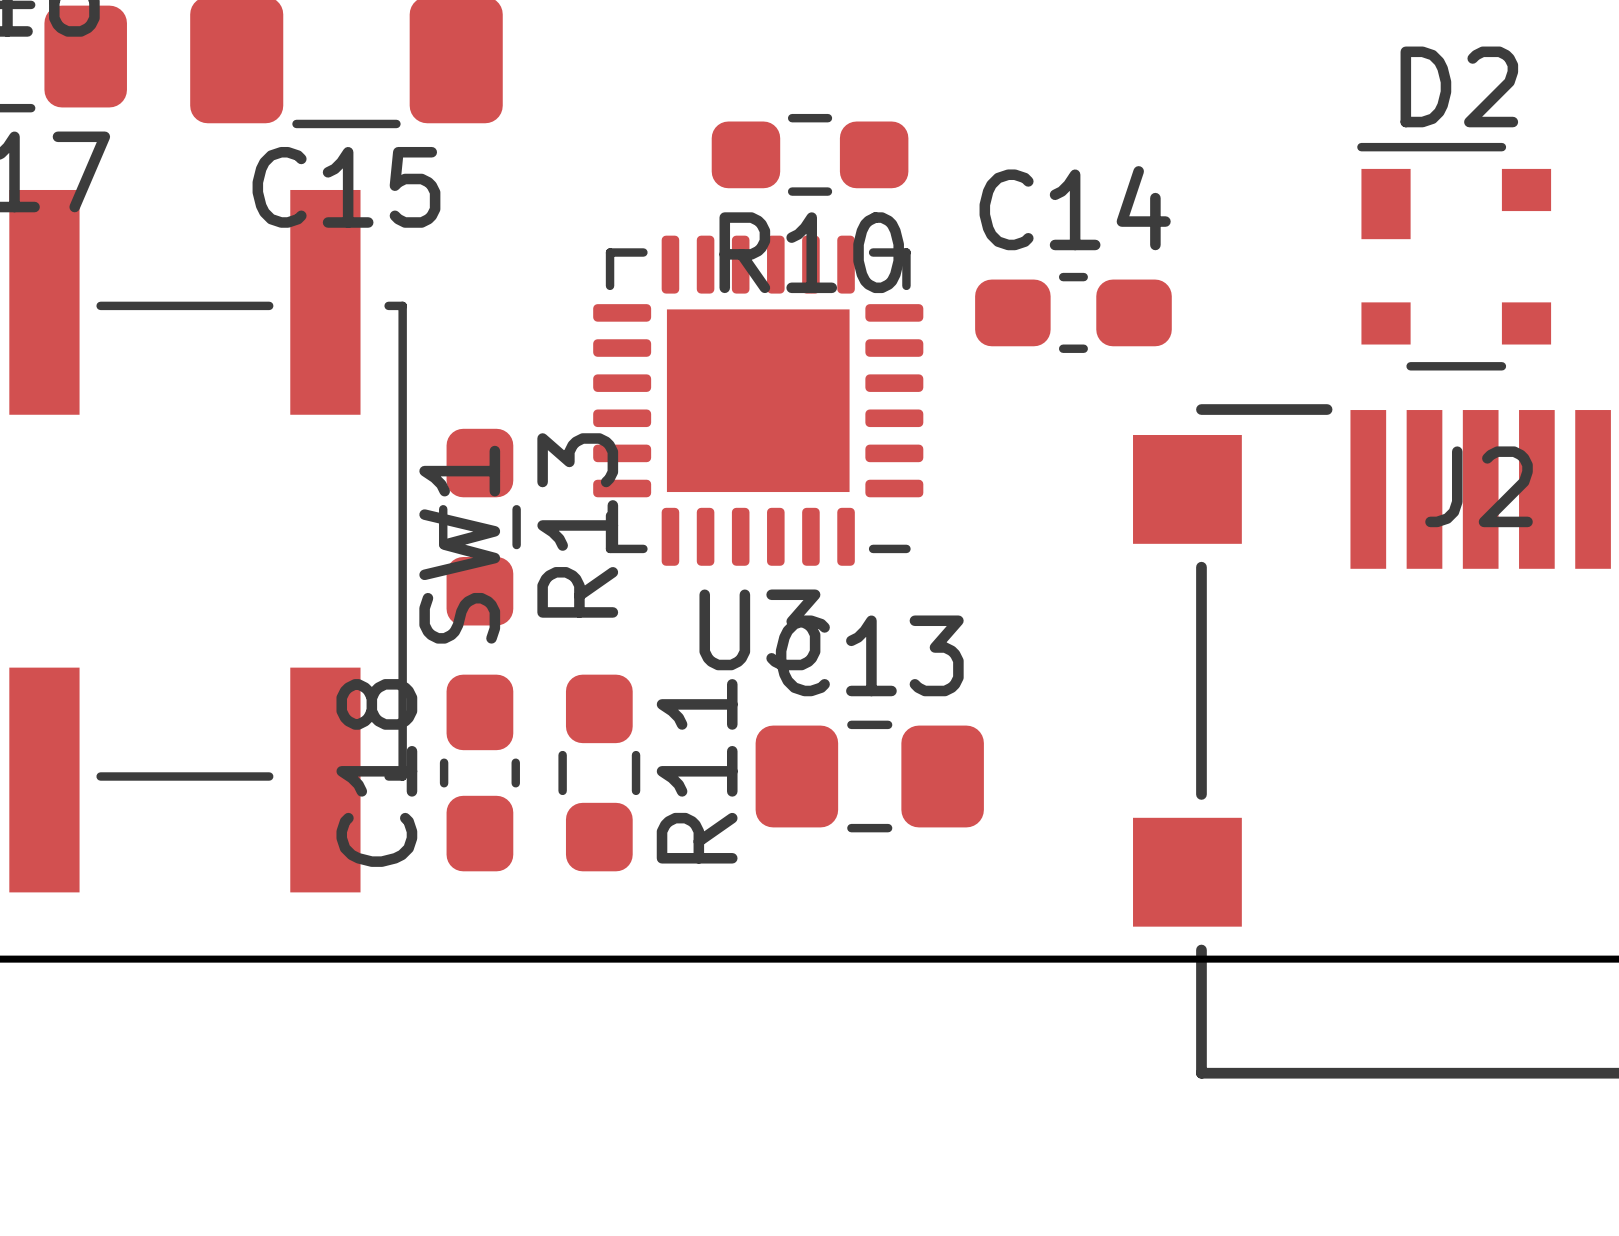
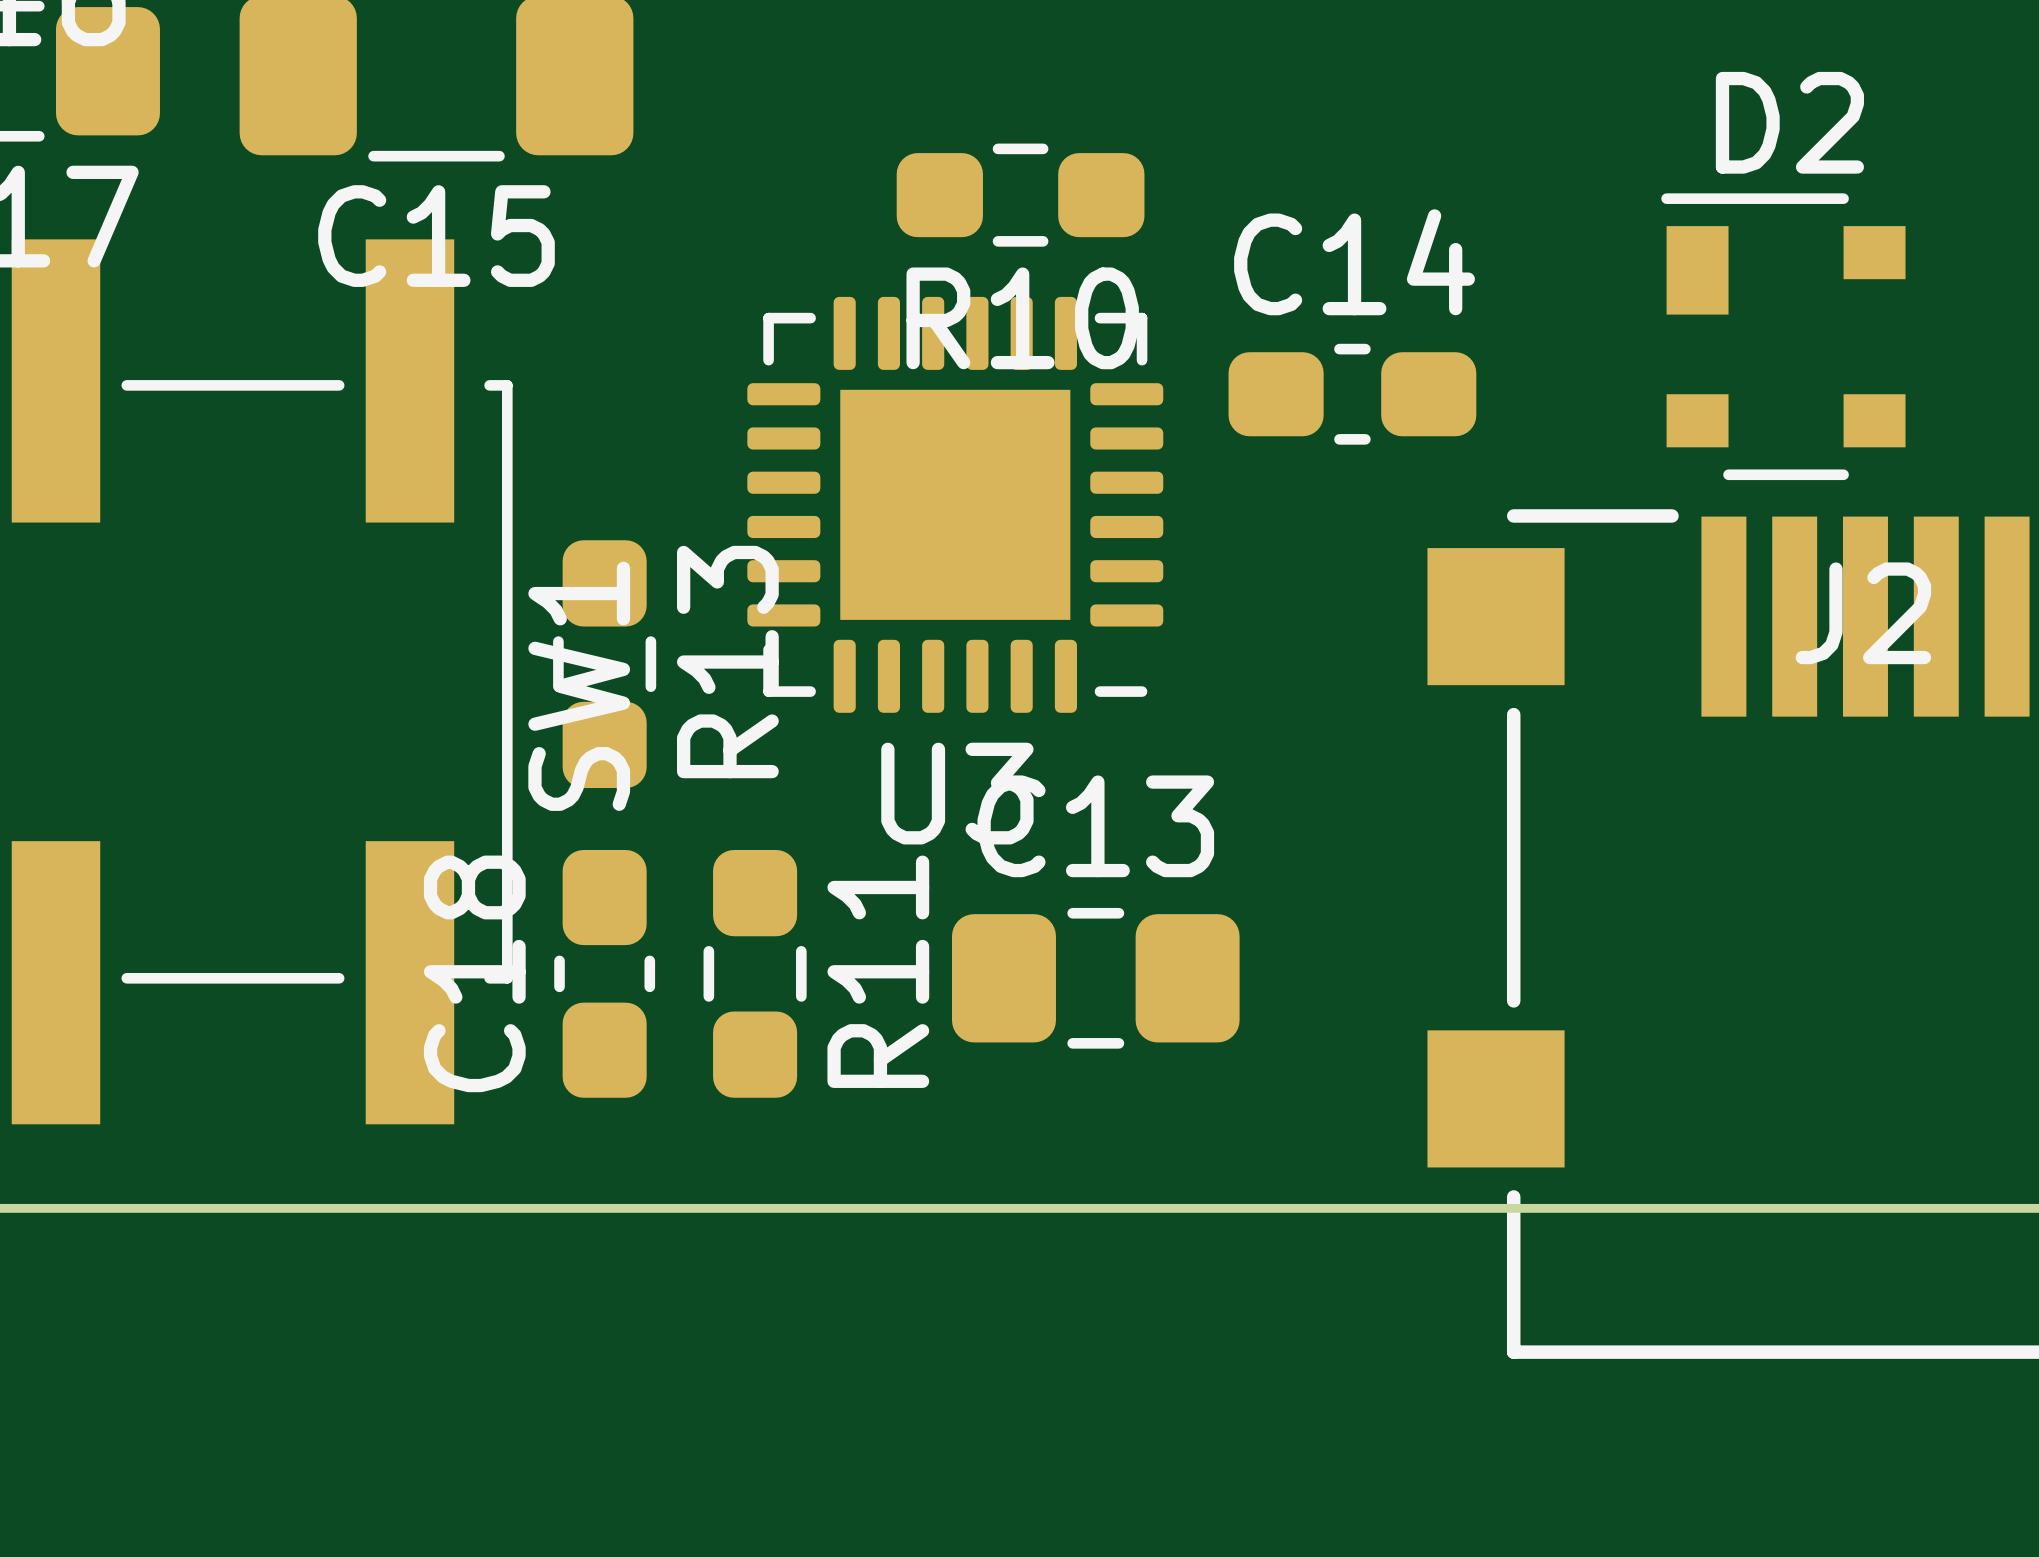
D2 position: (1454, 256) -> (1783, 336)

